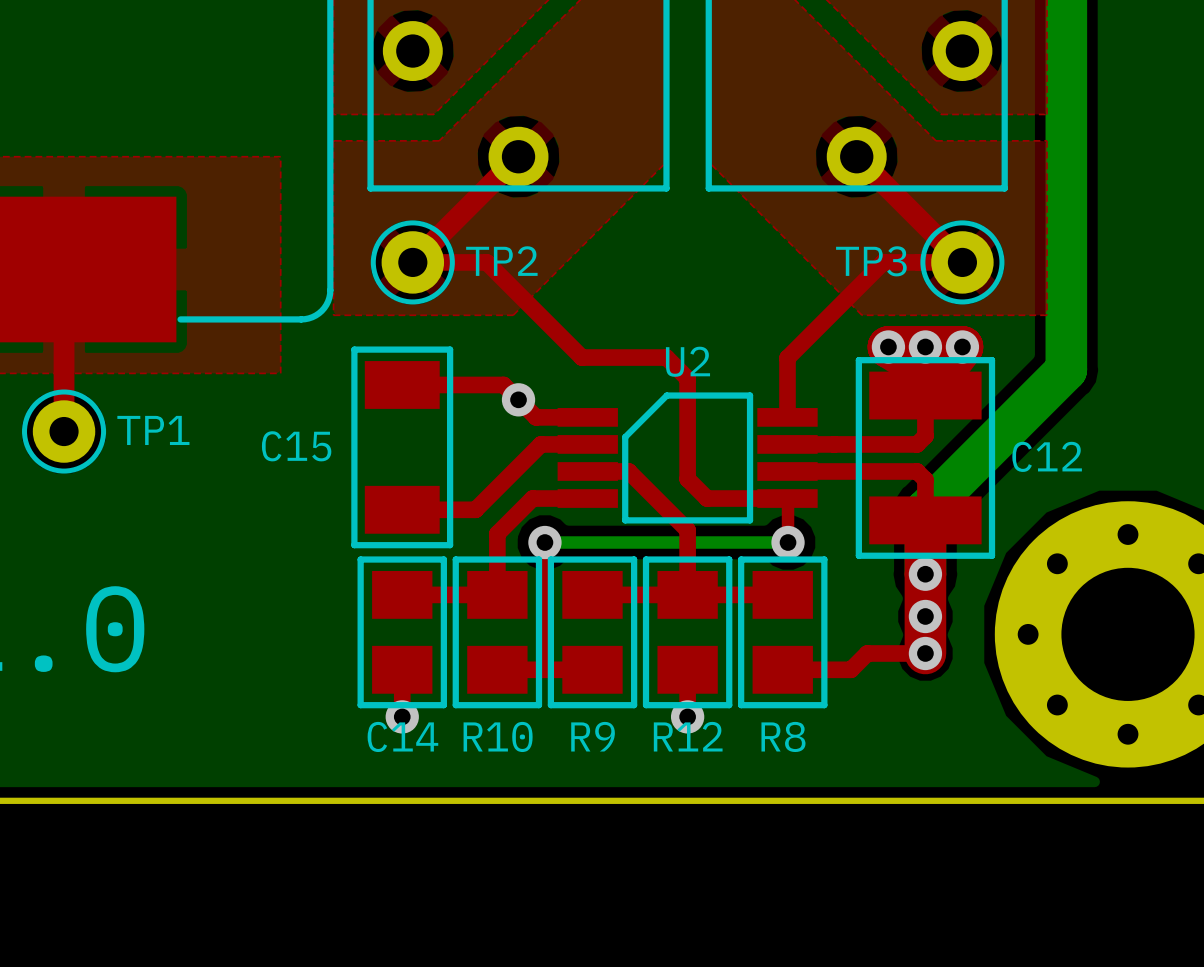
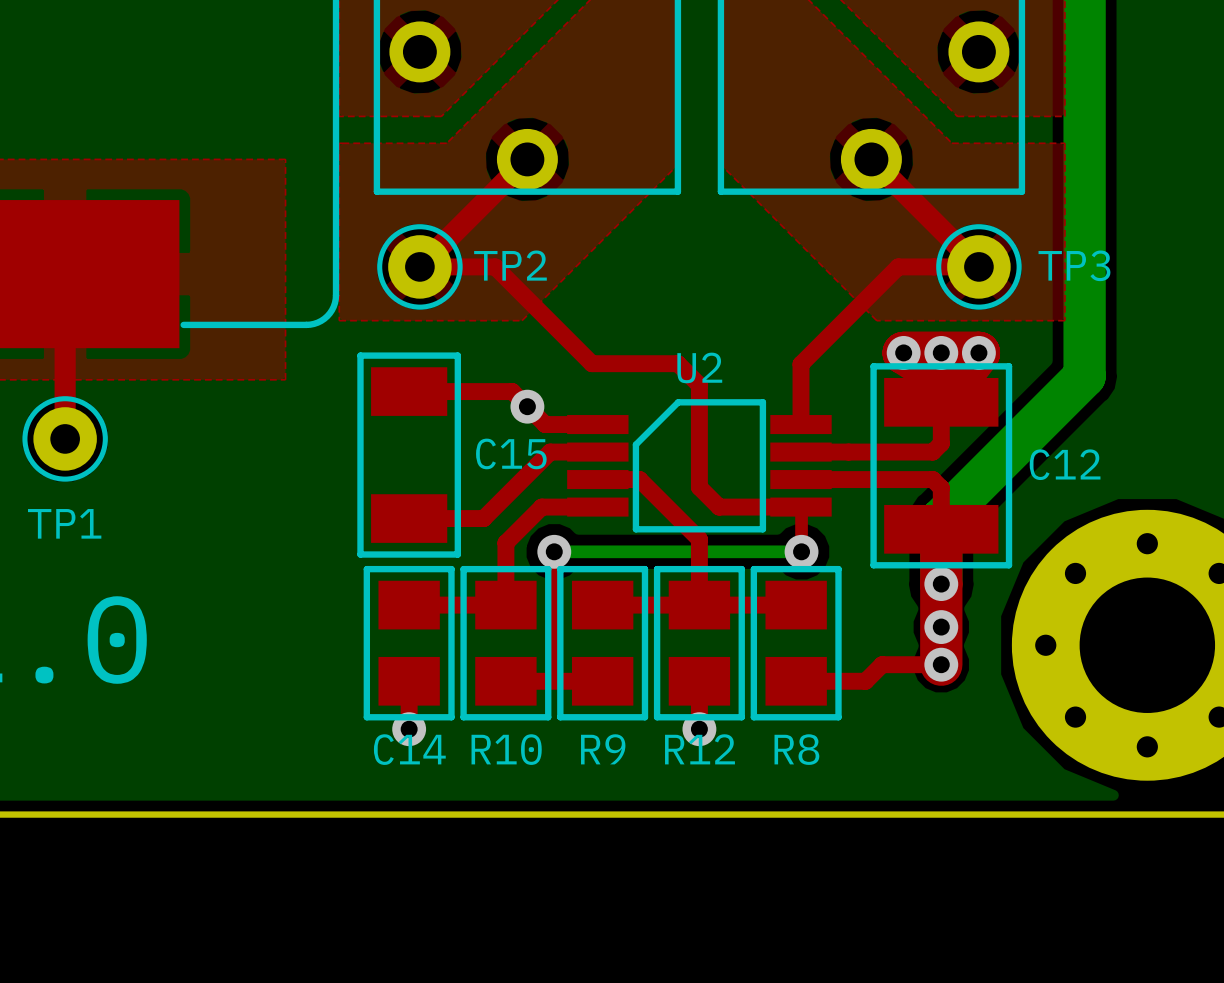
TP3 name position: TP3 (871, 261) -> TP3 (1074, 265)
TP1 name position: TP1 (153, 430) -> TP1 (64, 523)
C15 name position: C15 (296, 446) -> C15 (511, 453)

